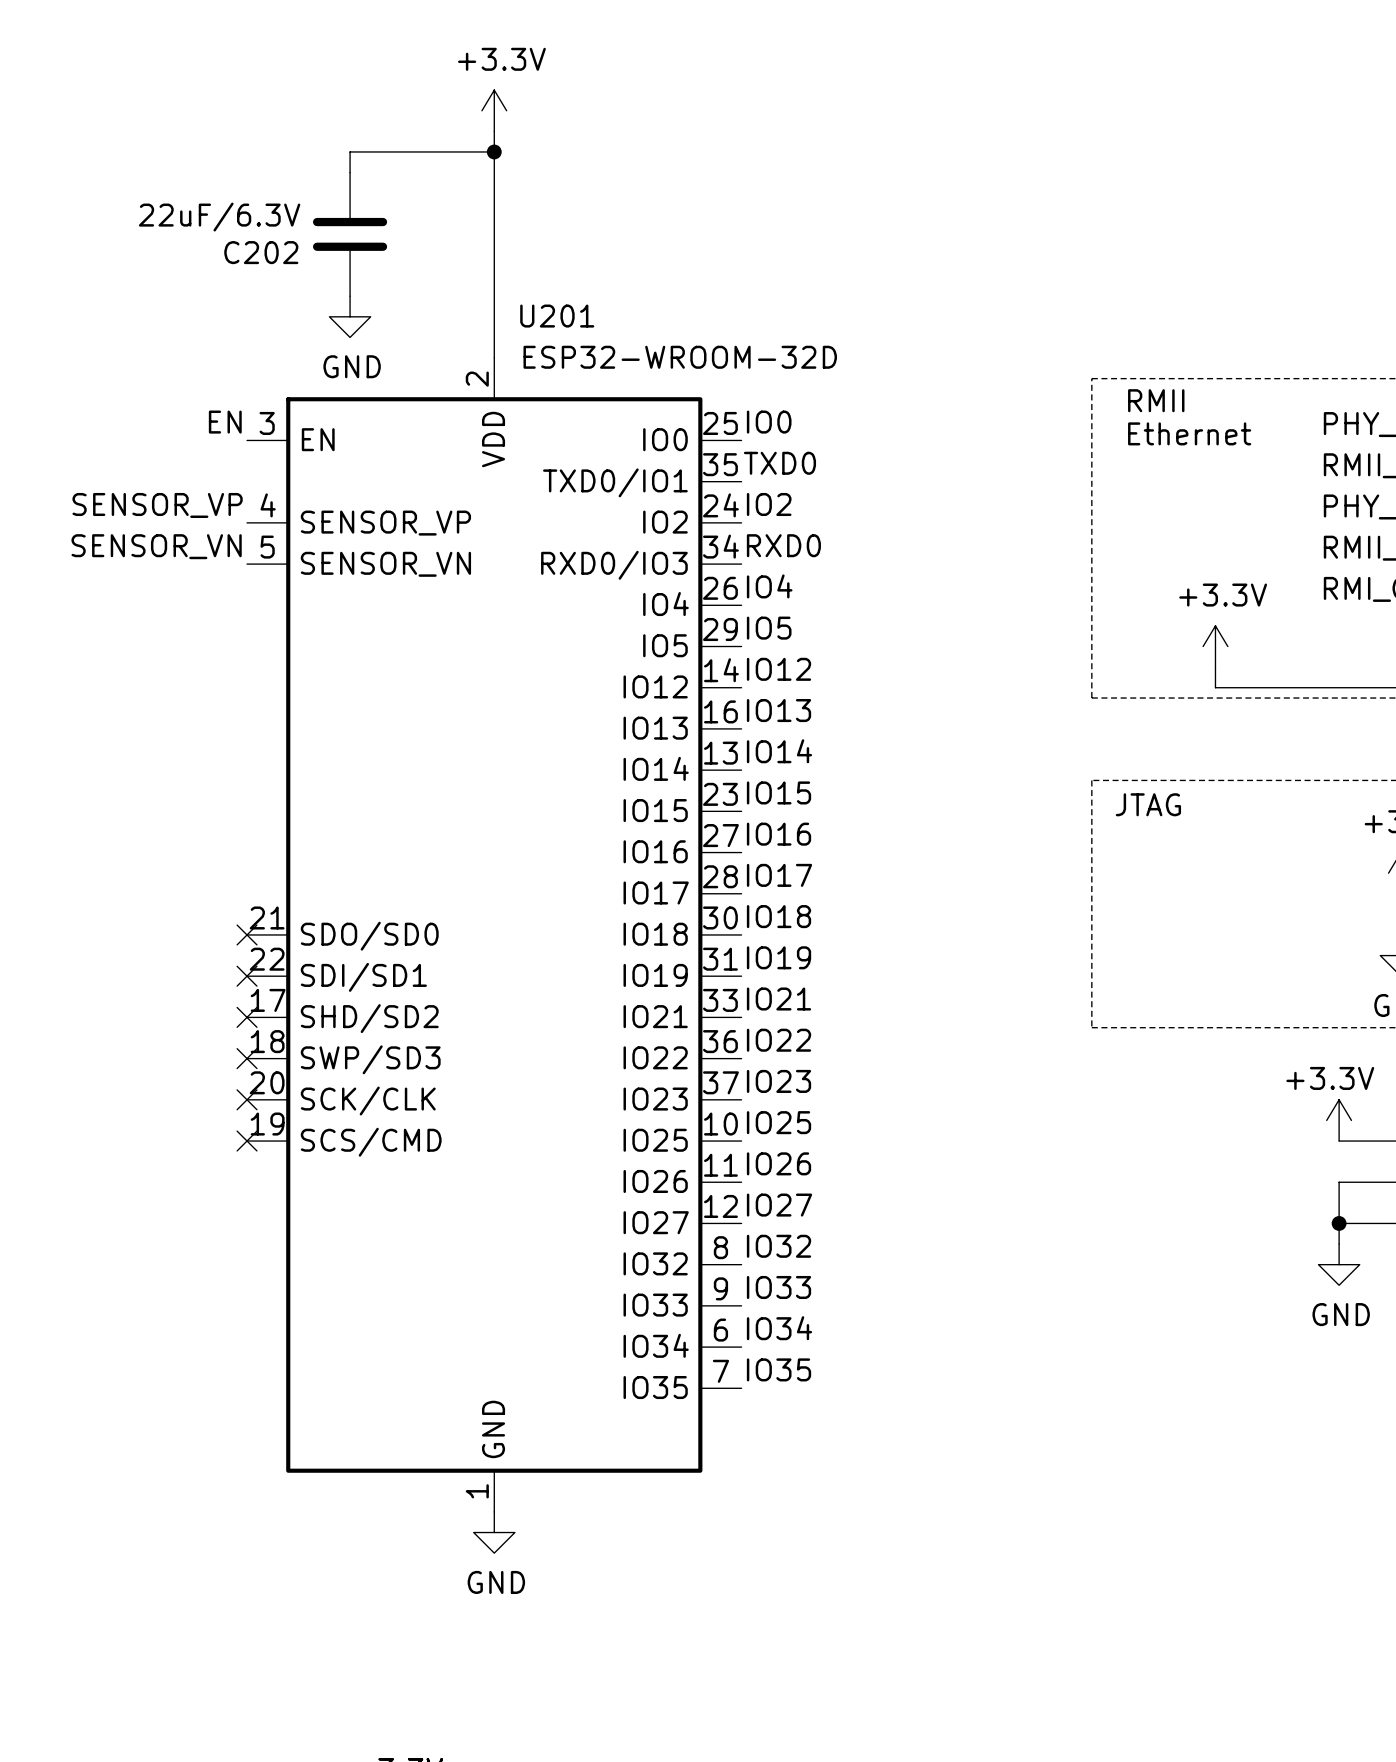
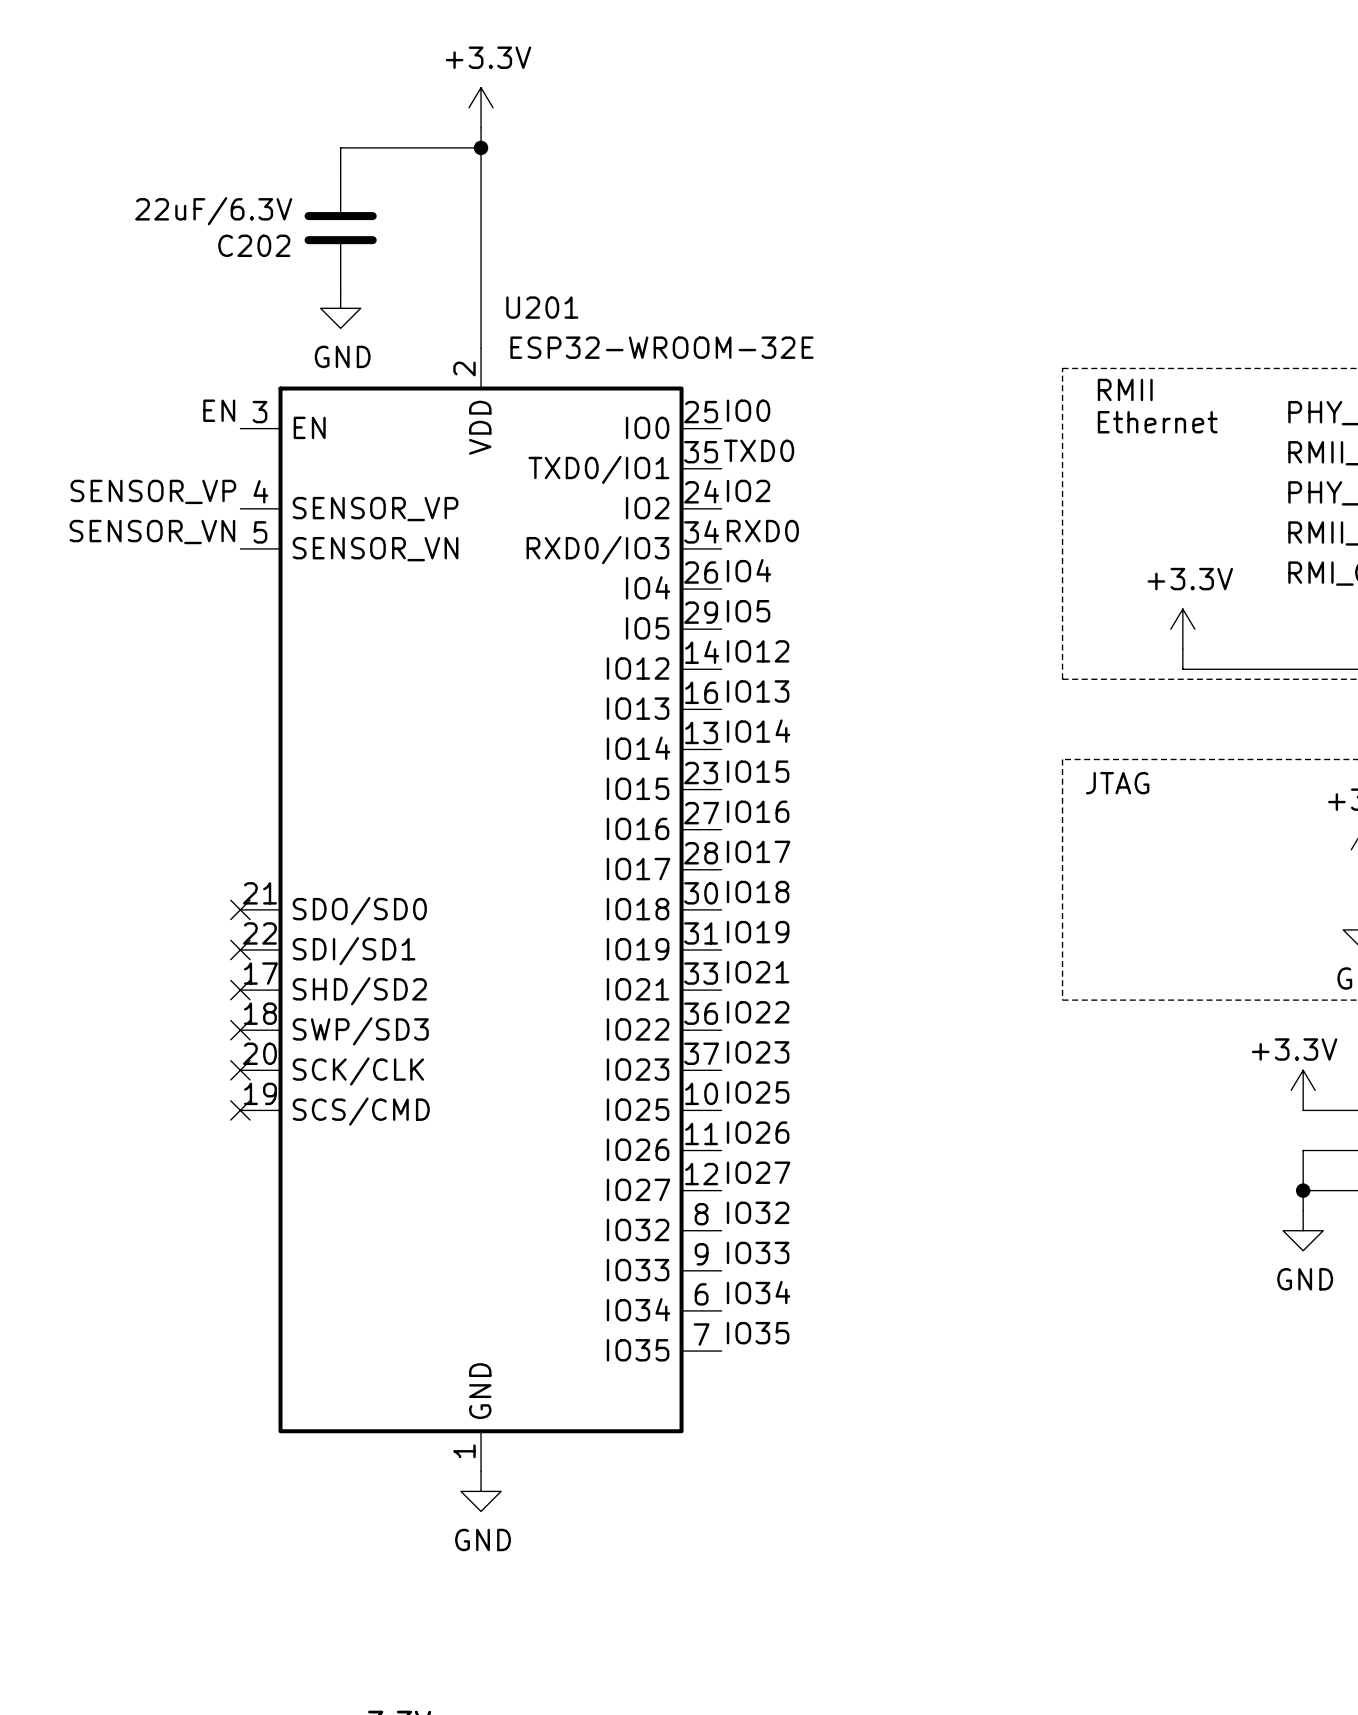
U201 value: ESP32-WROOM-32D (680, 357) -> ESP32-WROOM-32E (661, 347)

